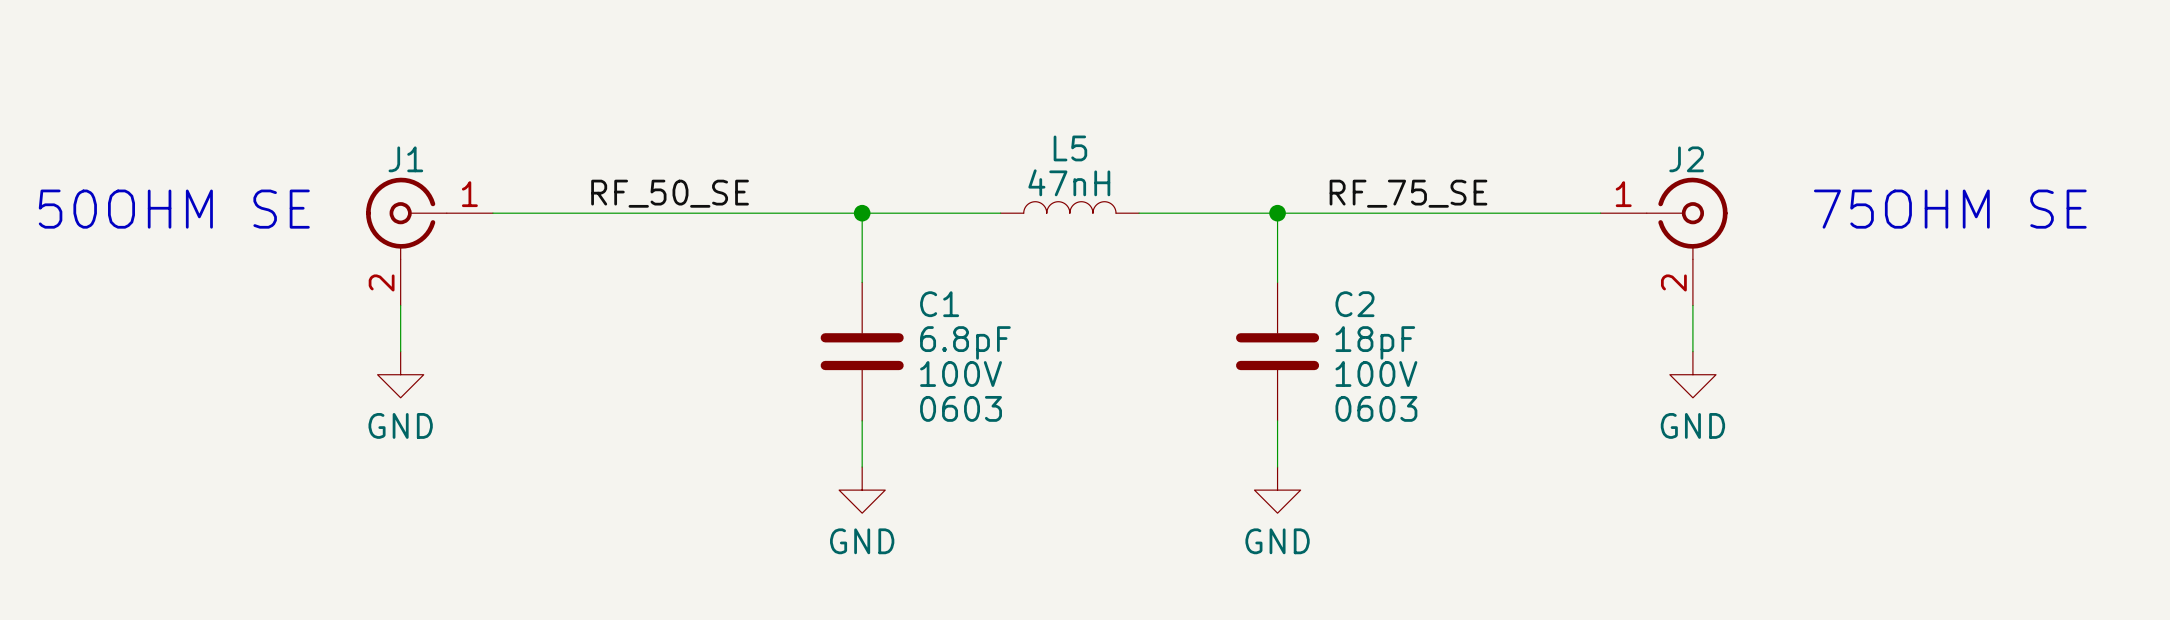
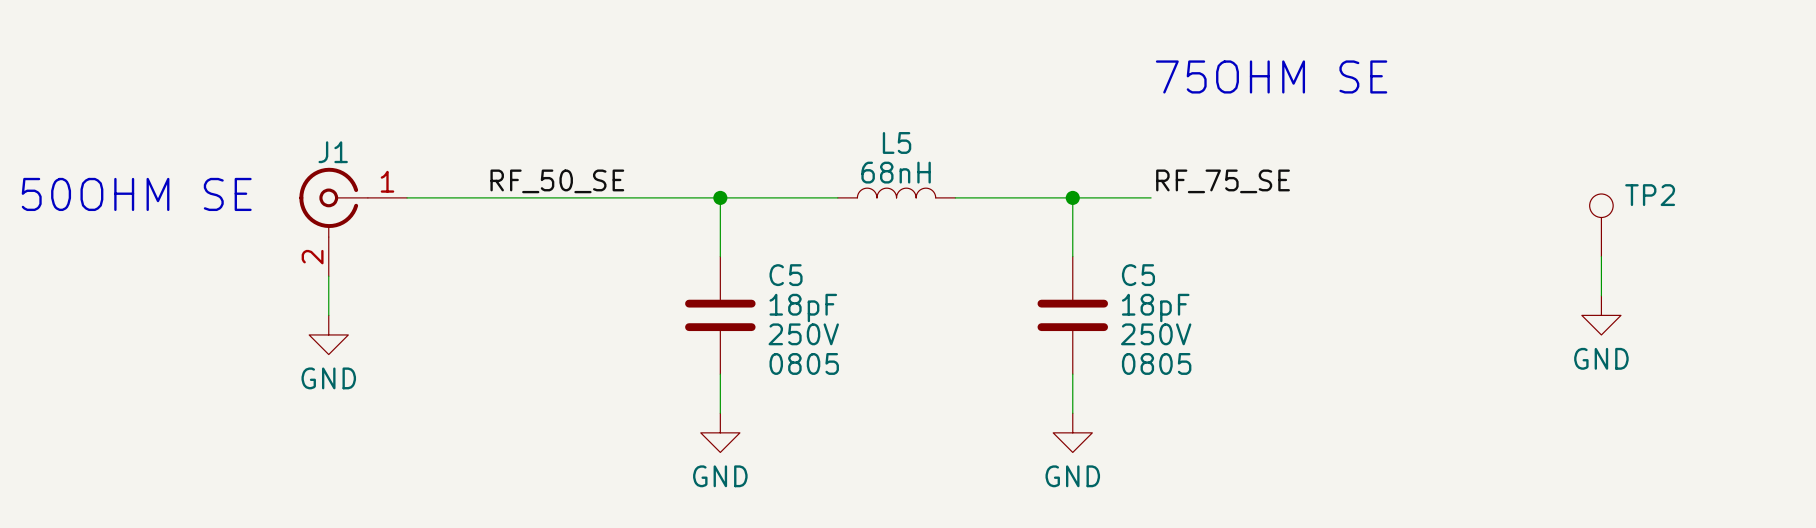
text: none -> 75OHM SE (1271, 76)
L5 value: 47nH (1069, 182) -> 68nH (896, 172)
label position: RF_75_SE (1408, 193) -> RF_75_SE (1223, 181)
text: 75OHM SE (1950, 209) -> none
wire: (1369, 213) (1600, 213) -> none
J2: (1664, 241) -> none
TP2: none -> (1601, 225)
C1 name: C1 (939, 304) -> C5 (786, 275)
C2 name: C2 (1354, 304) -> C5 (1138, 275)
wire: (1692, 305) (1692, 351) -> (1601, 256) (1601, 295)
C1 value: 6.8pF (965, 342) -> 18pF (803, 307)
C1 text: 100V (961, 374) -> 250V (803, 334)
C2 text: 100V (1376, 374) -> 250V (1156, 334)
power symbol position: GND (1692, 374) -> GND (1601, 315)
C1 text: 0603 (961, 408) -> 0805 (804, 363)
C2 text: 0603 (1376, 408) -> 0805 (1156, 363)

